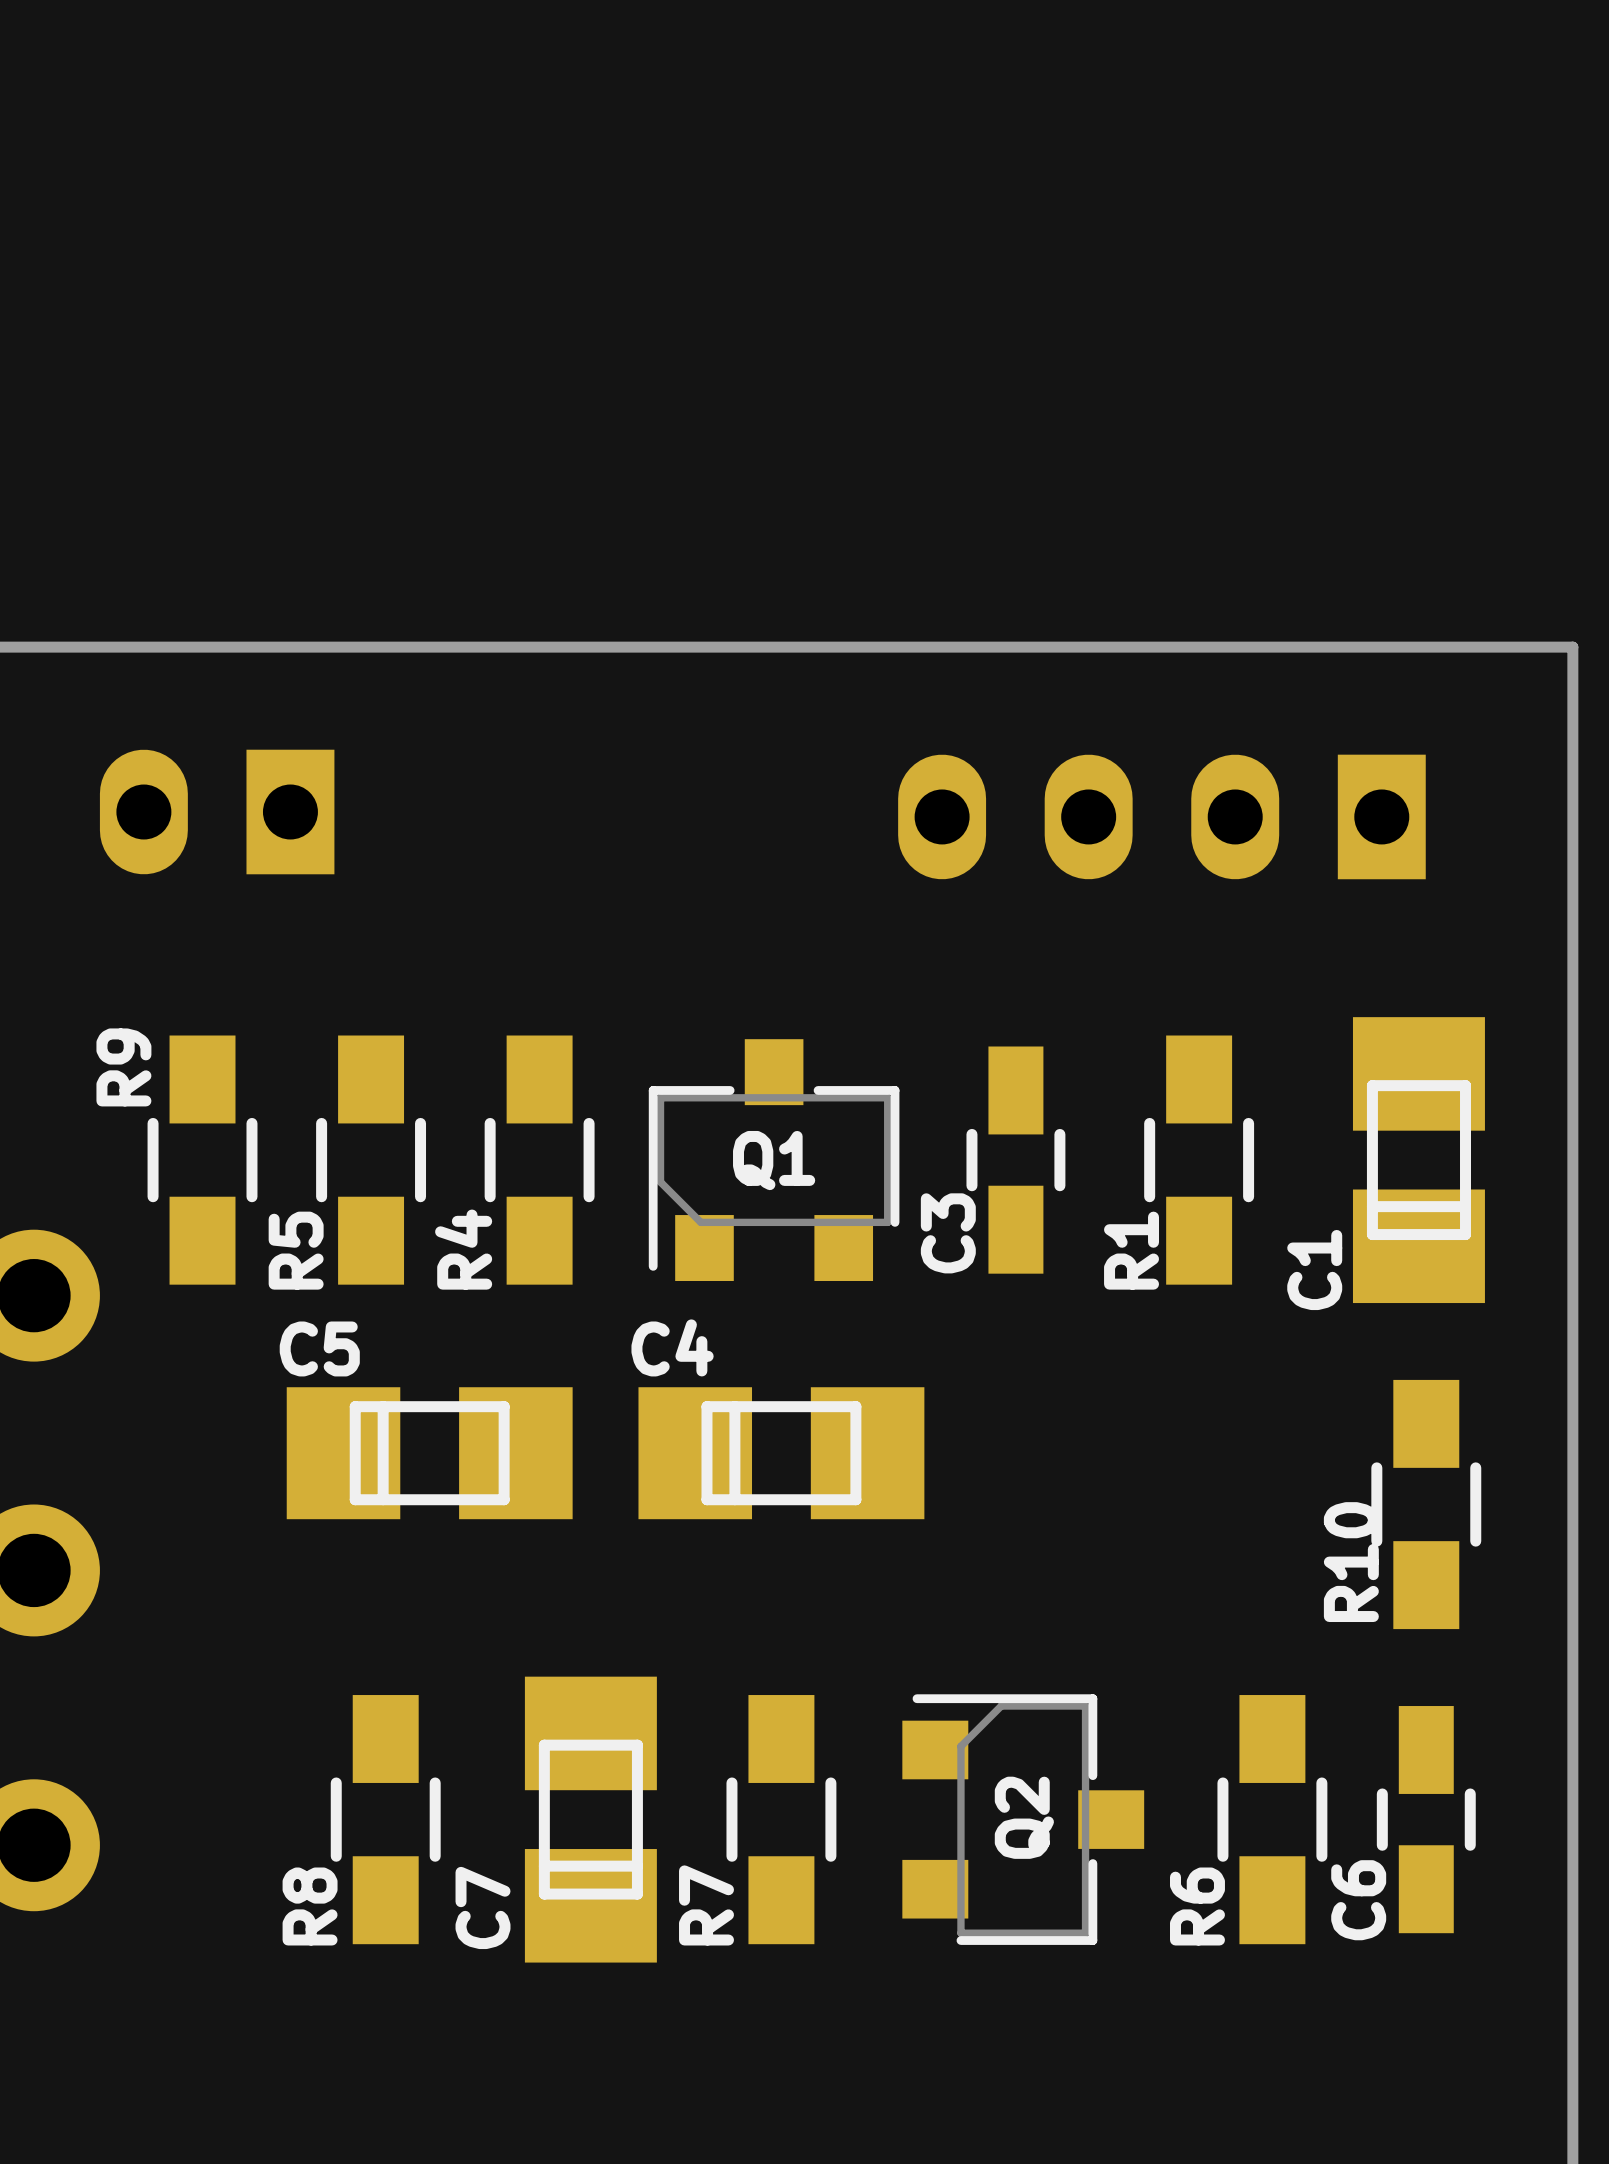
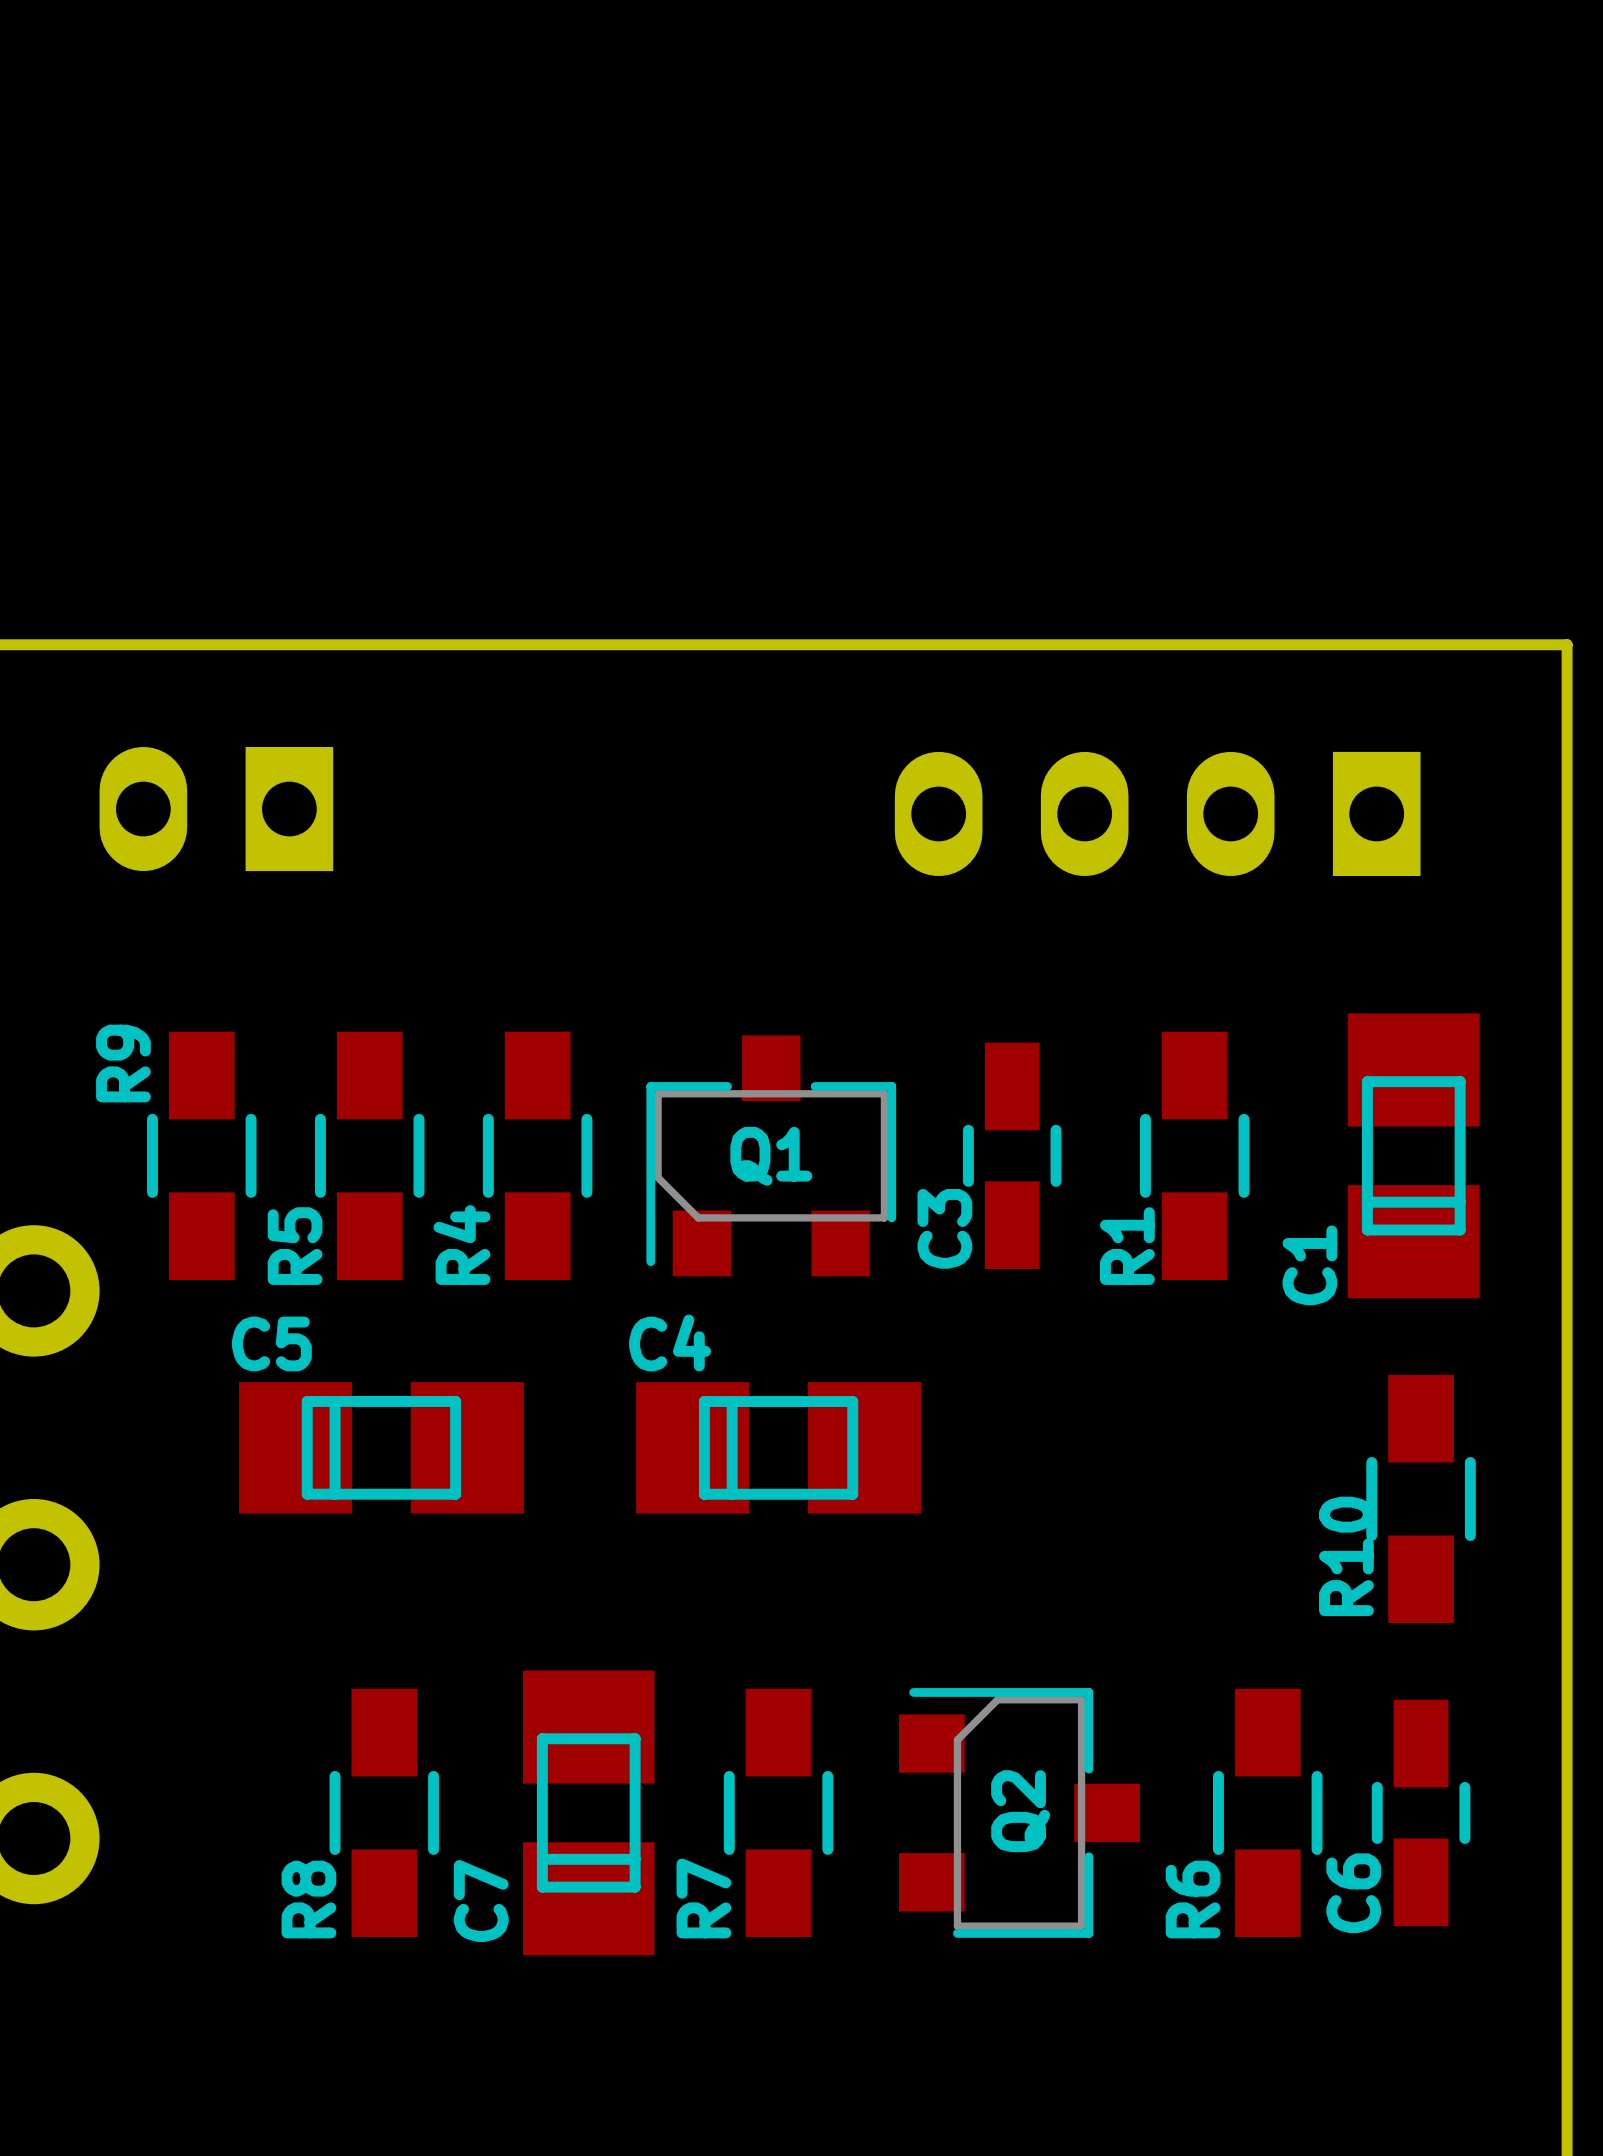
C5 position: (429, 1453) -> (381, 1447)

